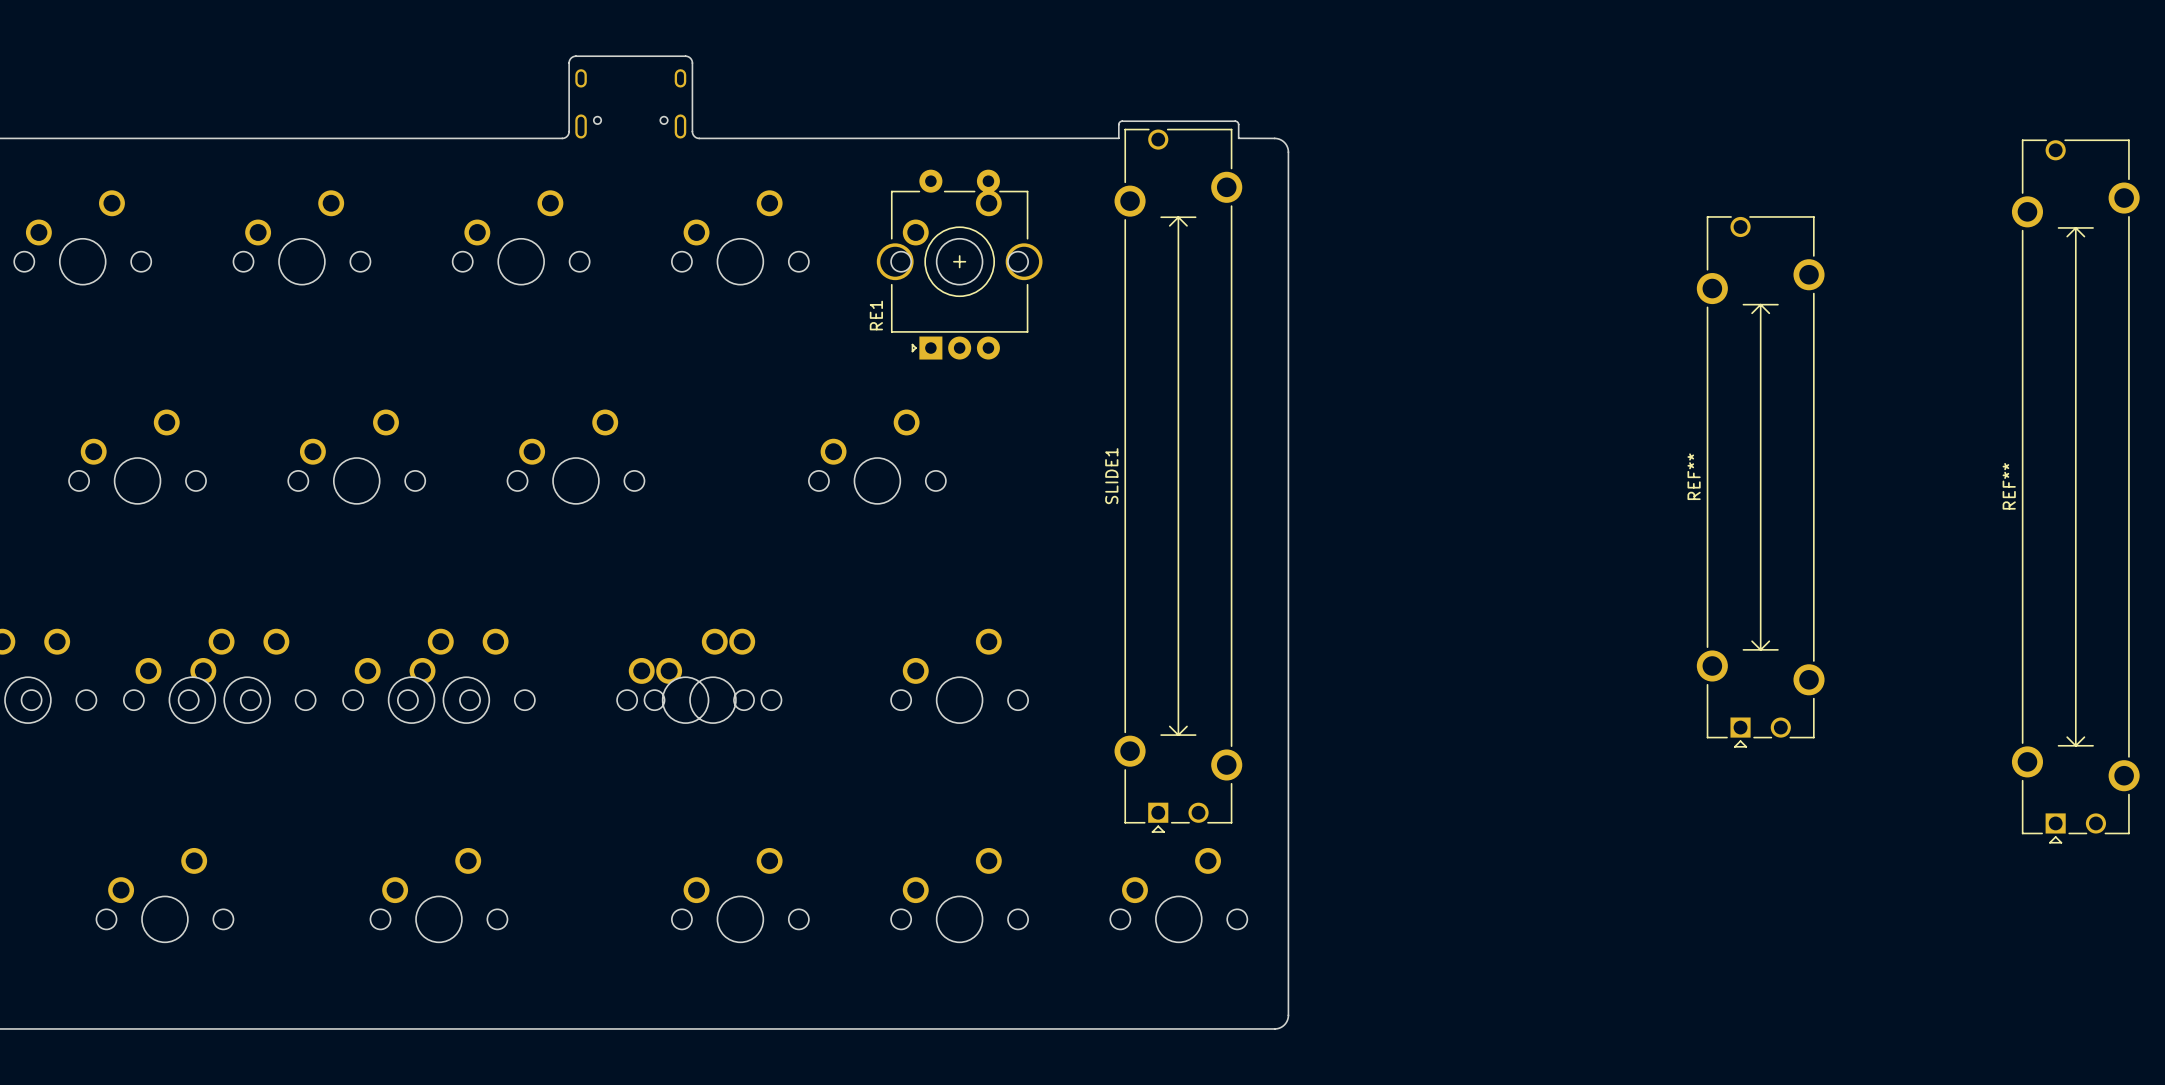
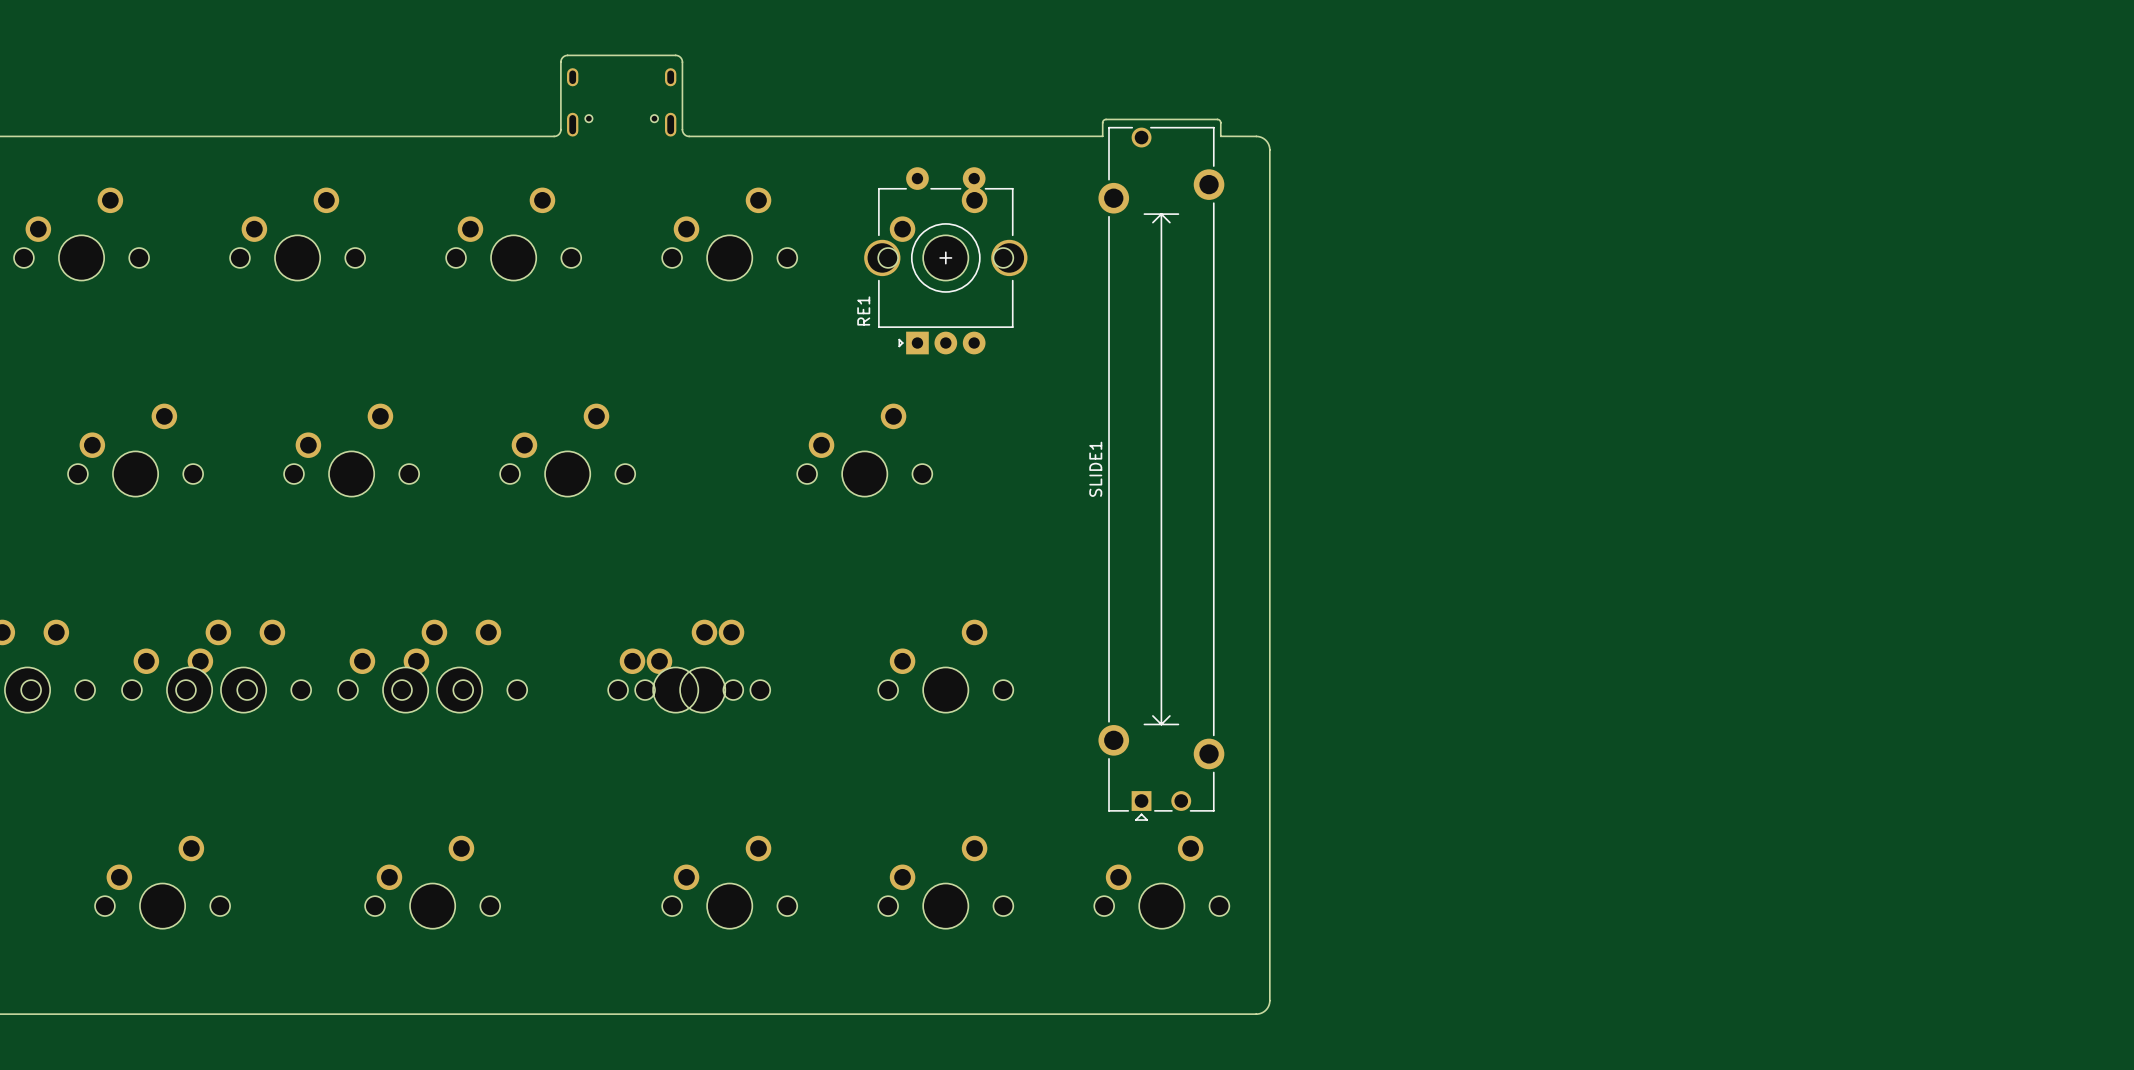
REF**: (1760, 481) -> none
REF**: (2075, 491) -> none

